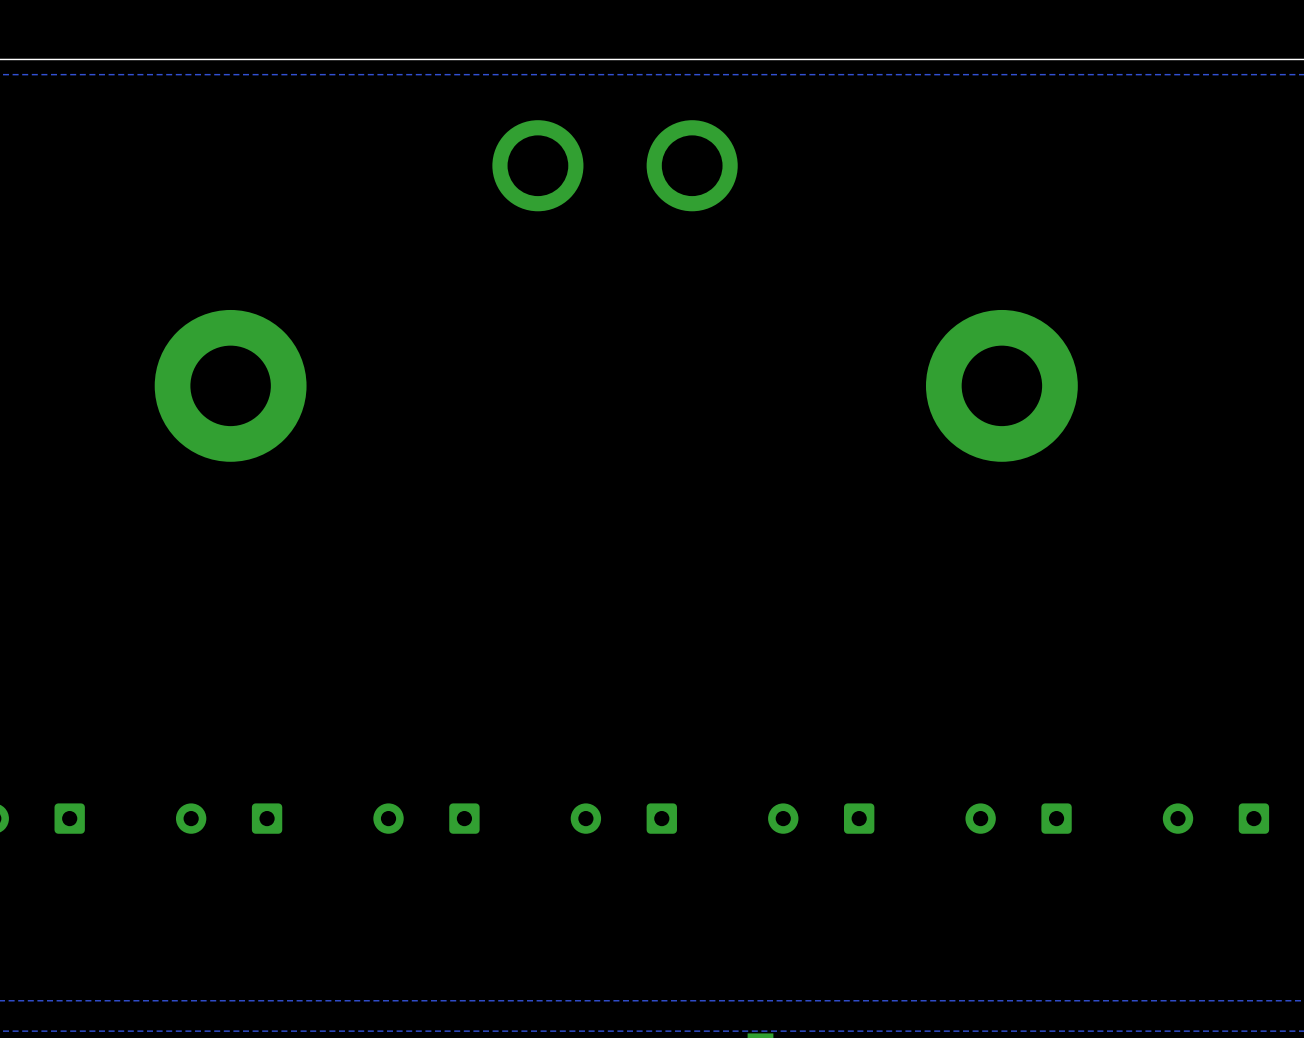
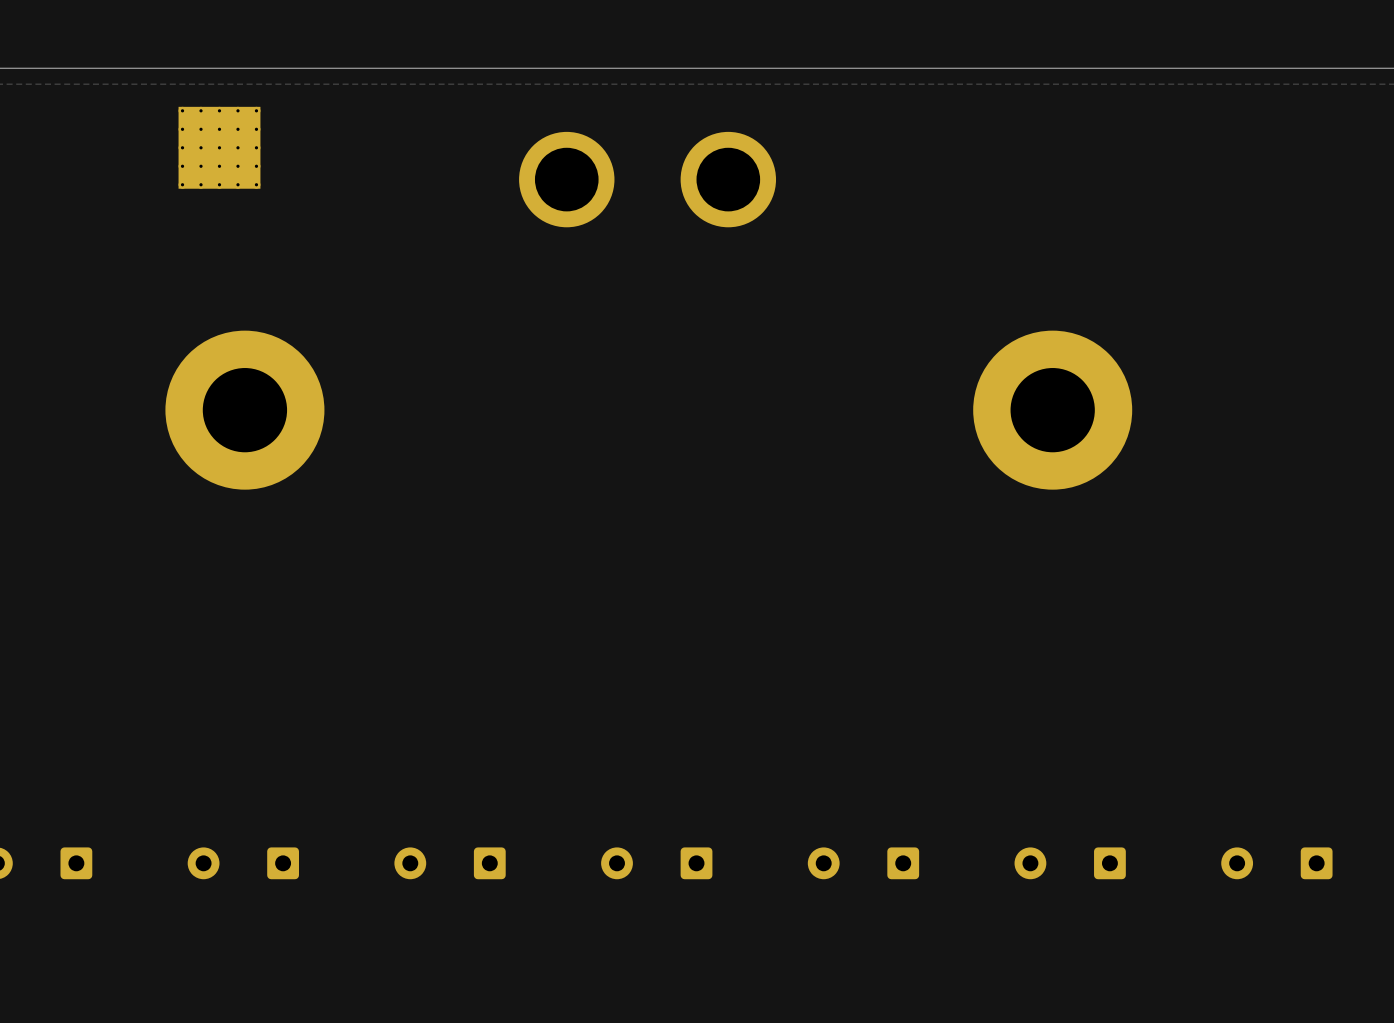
part: none -> (219, 147)

